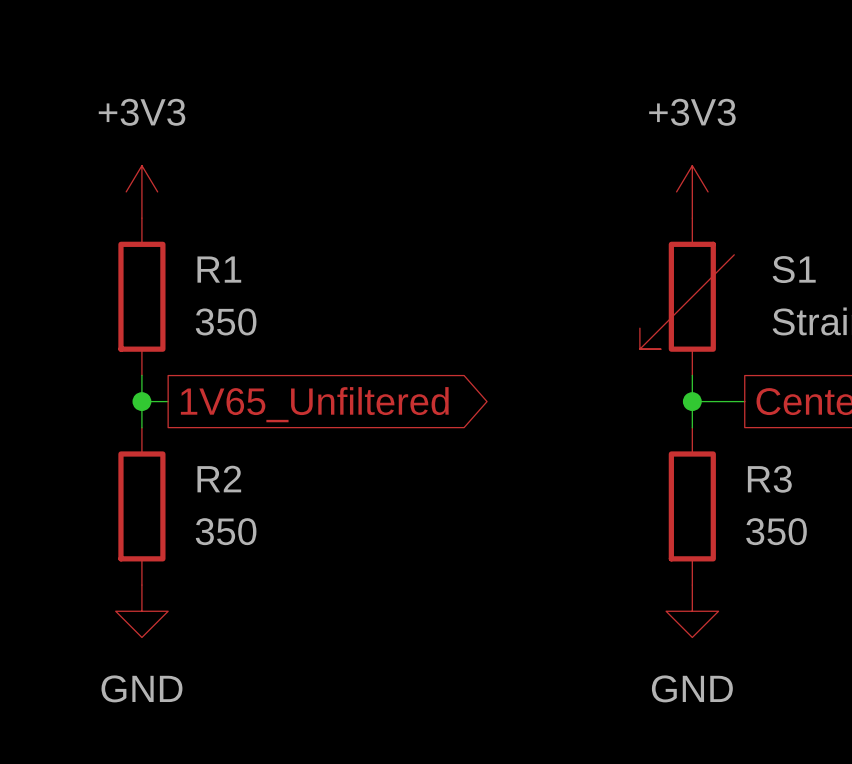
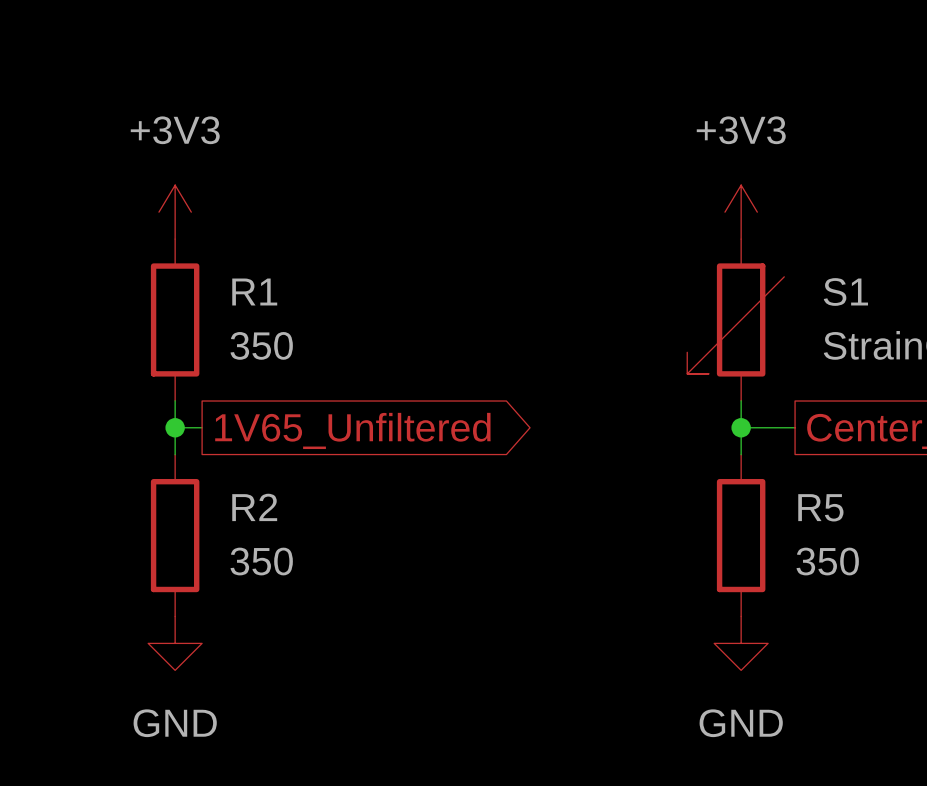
R3 name: R3 (769, 479) -> R5 (820, 507)

